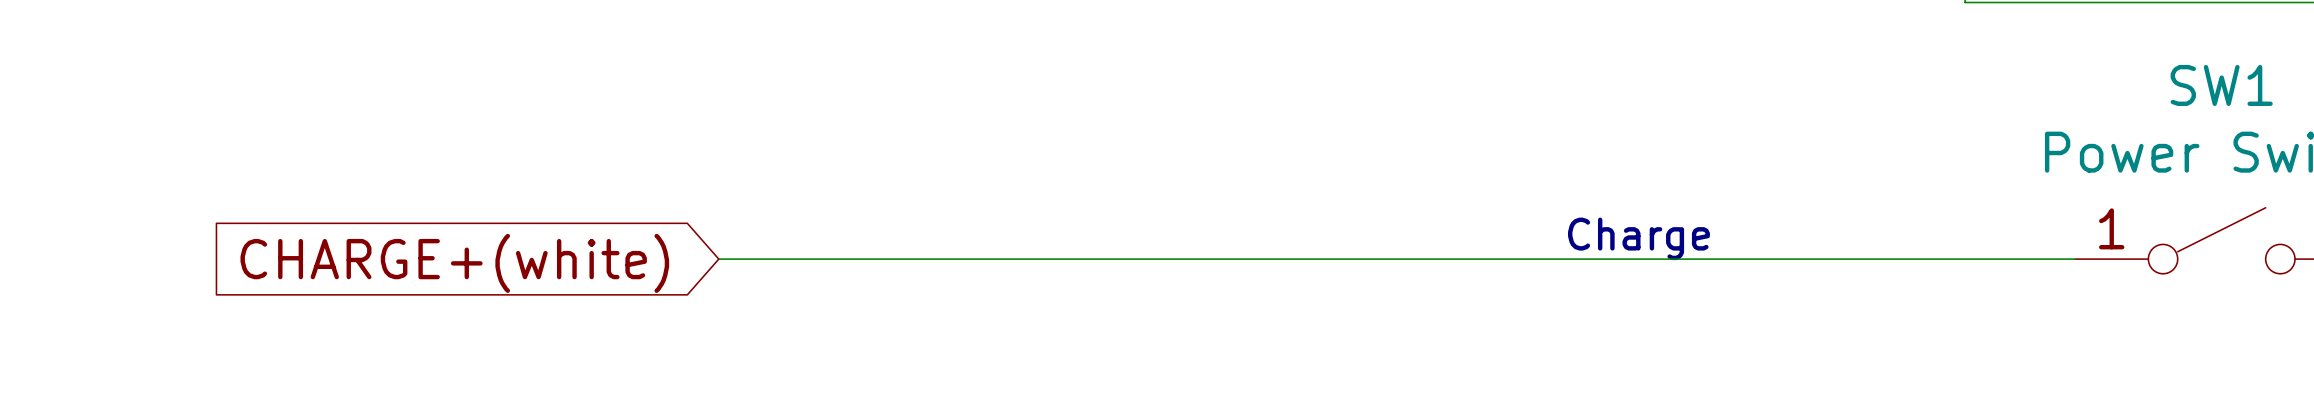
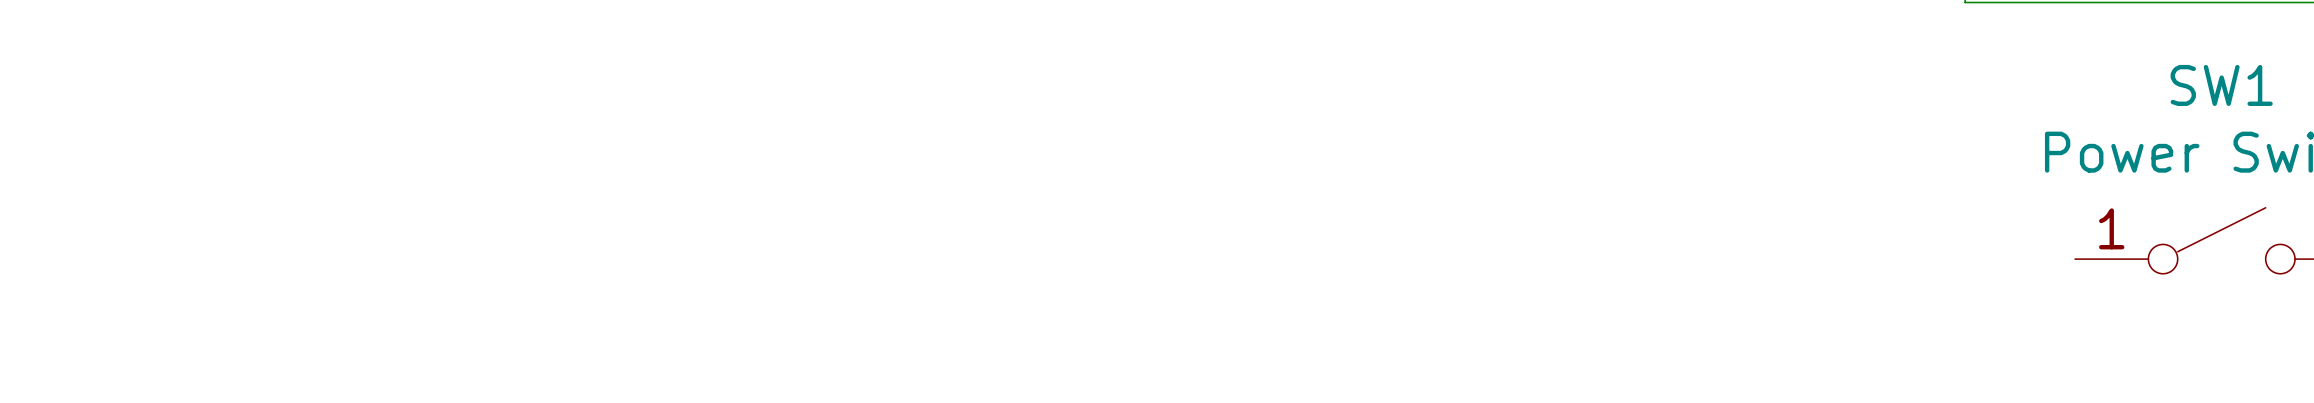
text: Charge (1638, 238) -> none
wire: (718, 259) (2075, 259) -> none
global label: CHARGE+(white) (454, 263) -> none

